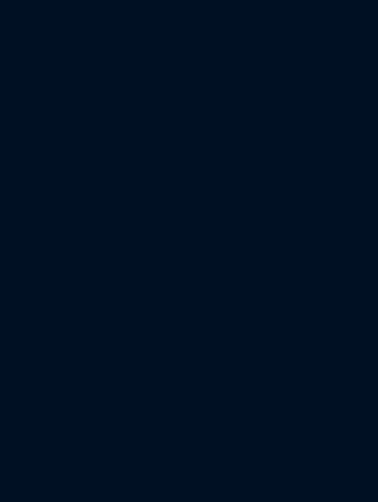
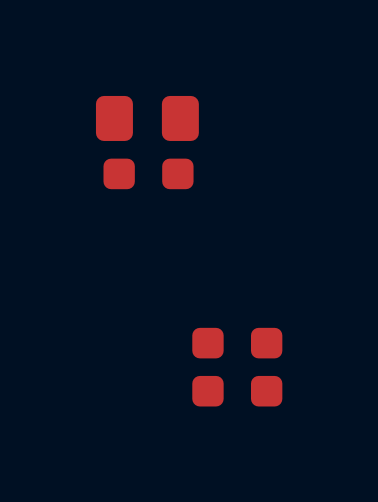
part: none -> (147, 118)
part: none -> (148, 173)
part: none -> (237, 343)
part: none -> (237, 391)

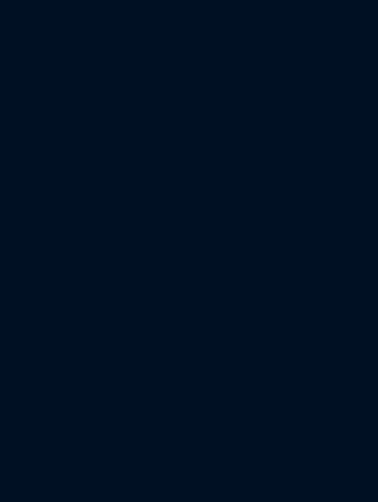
part: (147, 118) -> none
part: (148, 173) -> none
part: (237, 343) -> none
part: (237, 391) -> none

